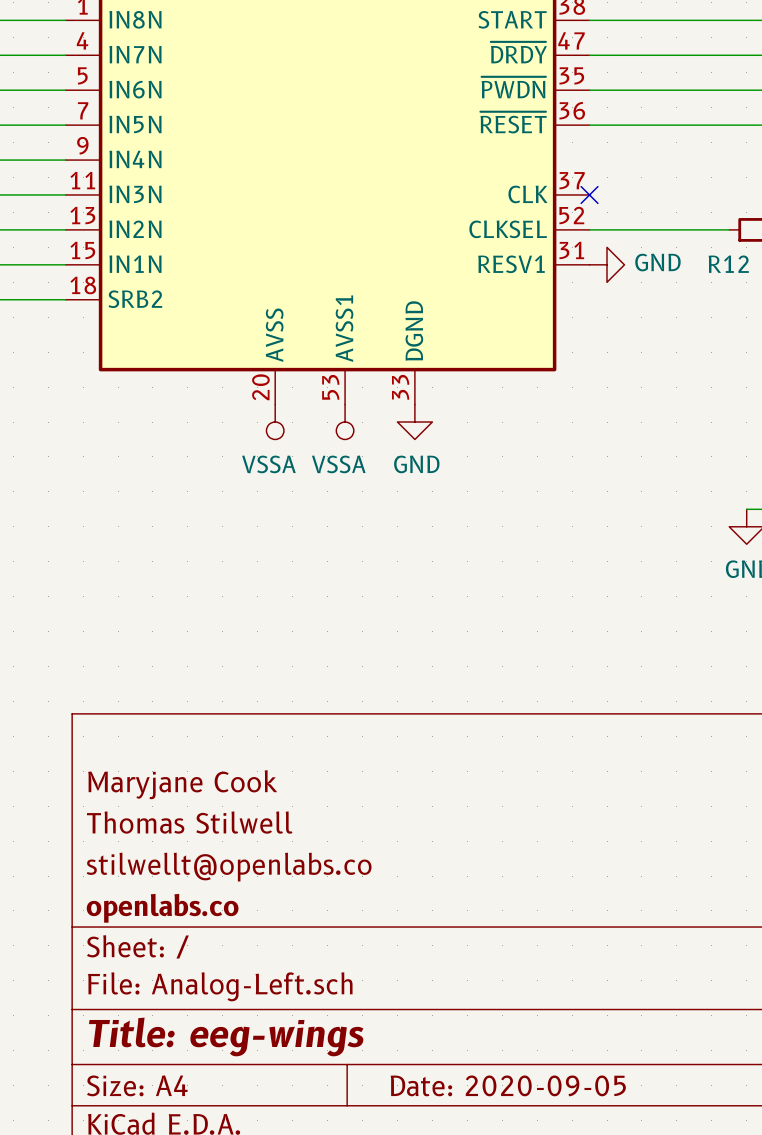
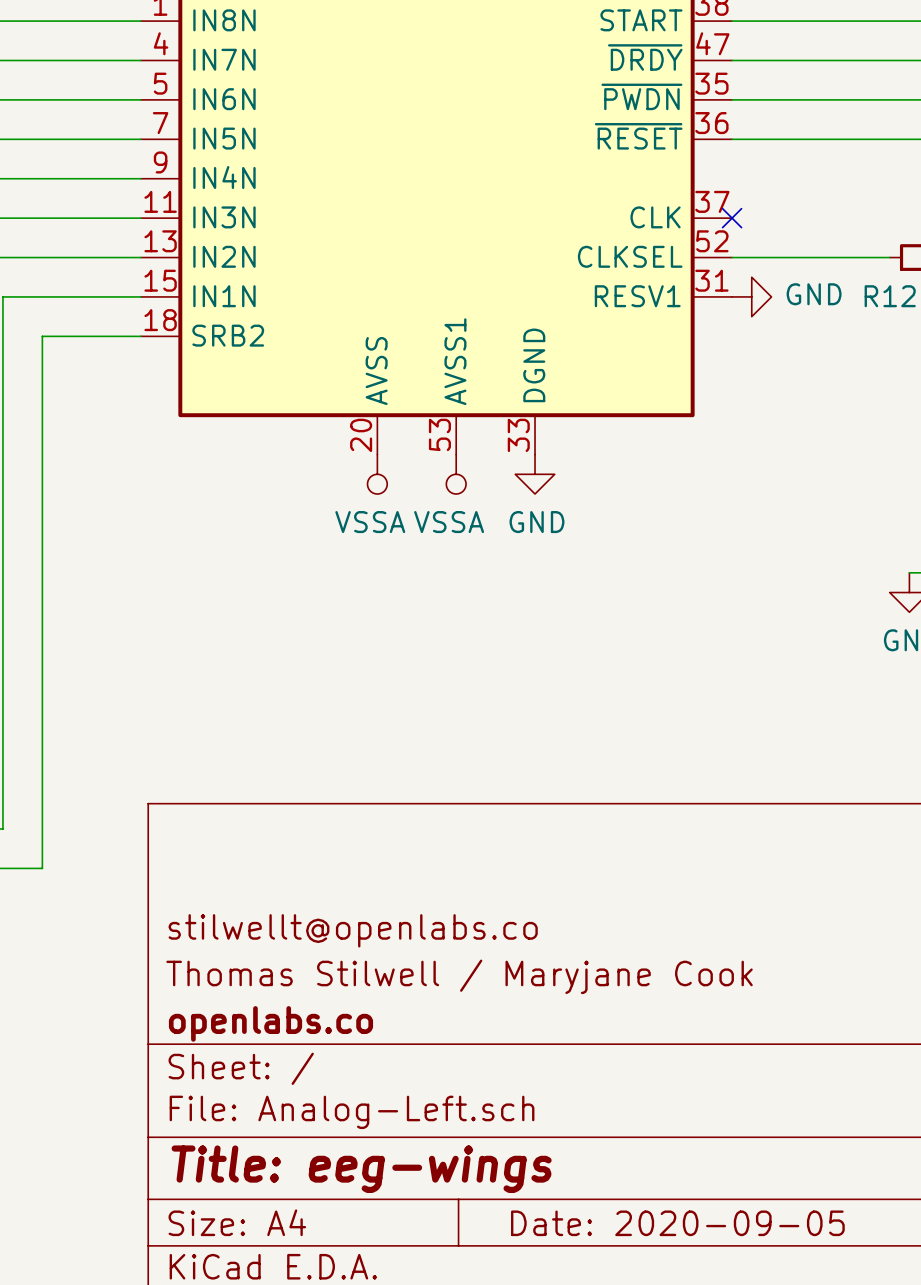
title block: Maryjane Cook (182, 784) -> none
title block: Thomas Stilwell (189, 822) -> stilwellt@openlabs.co (353, 930)
title block: stilwellt@openlabs.co (229, 867) -> Thomas Stilwell / Maryjane Cook (459, 976)

